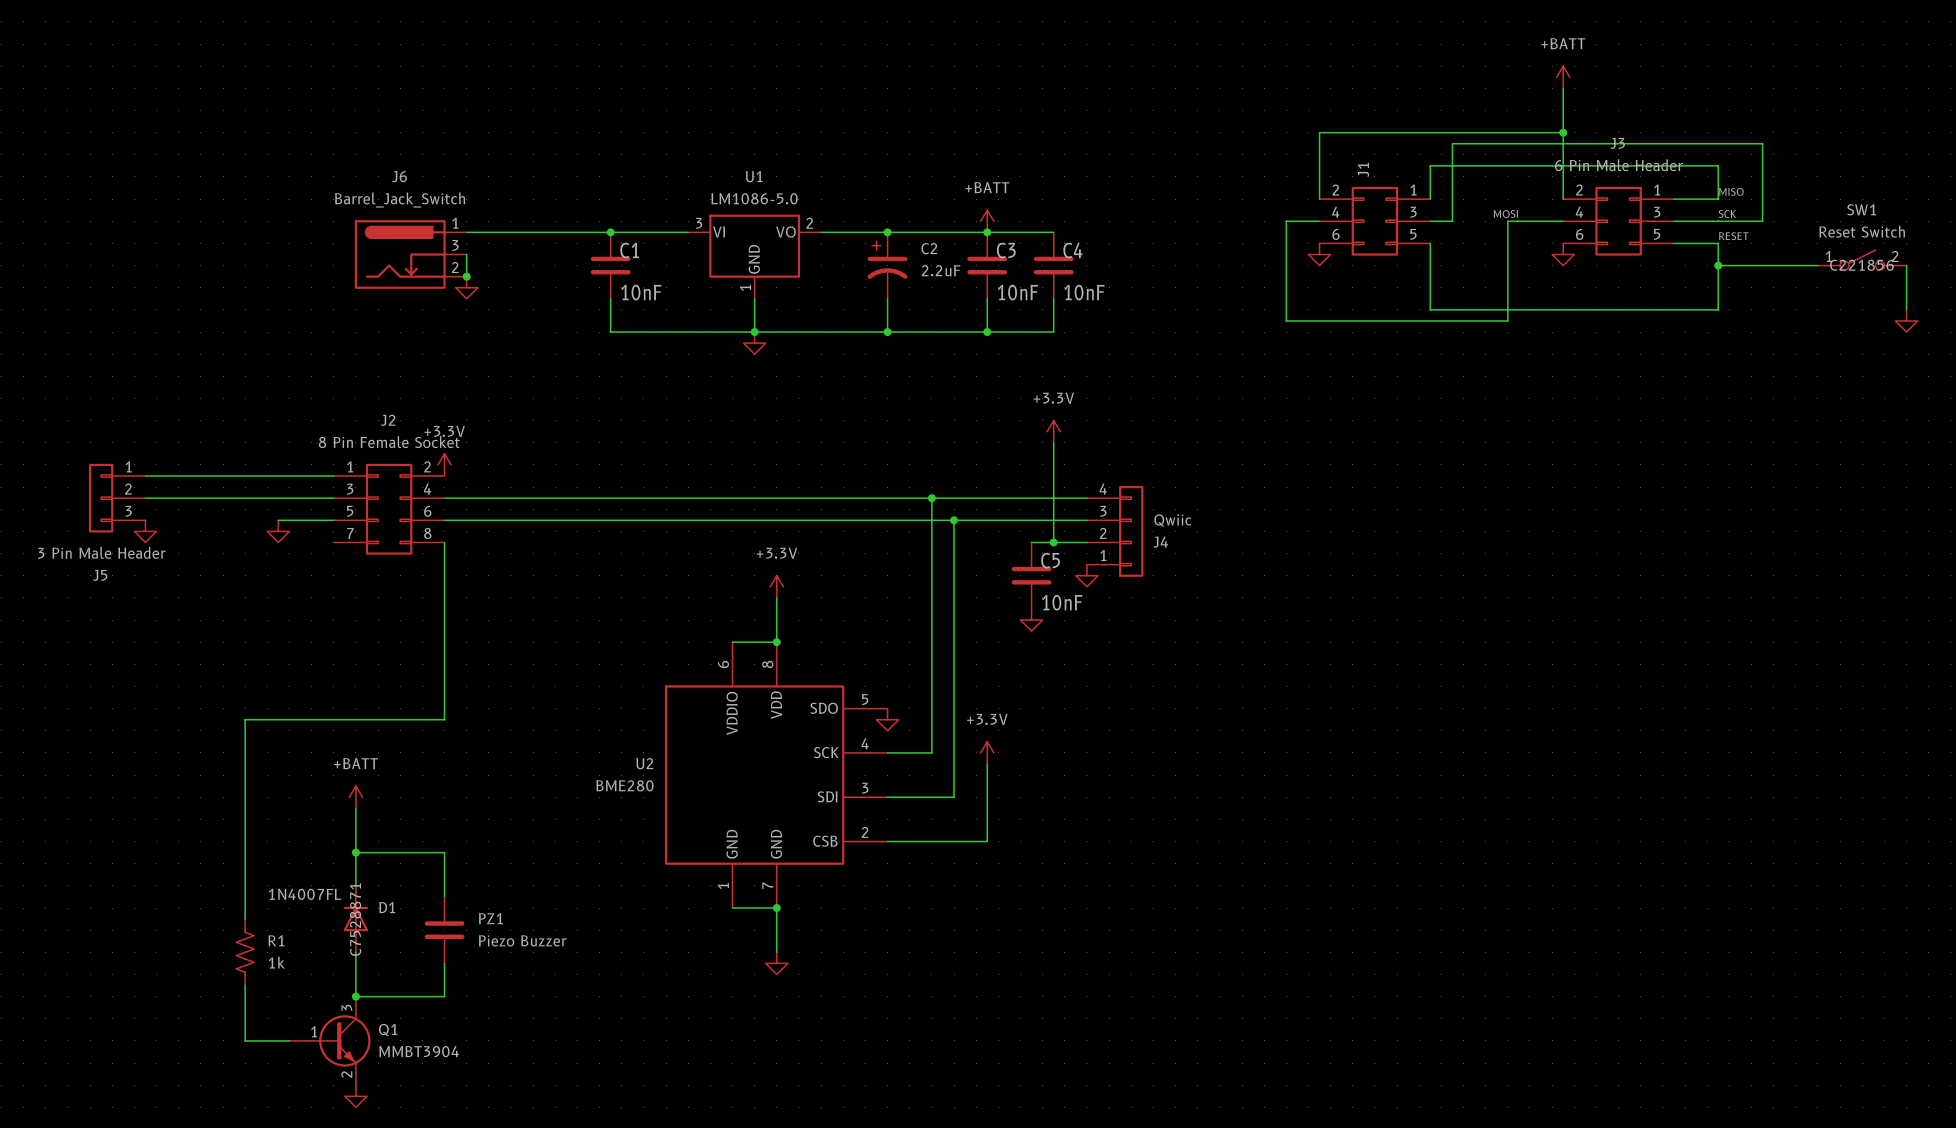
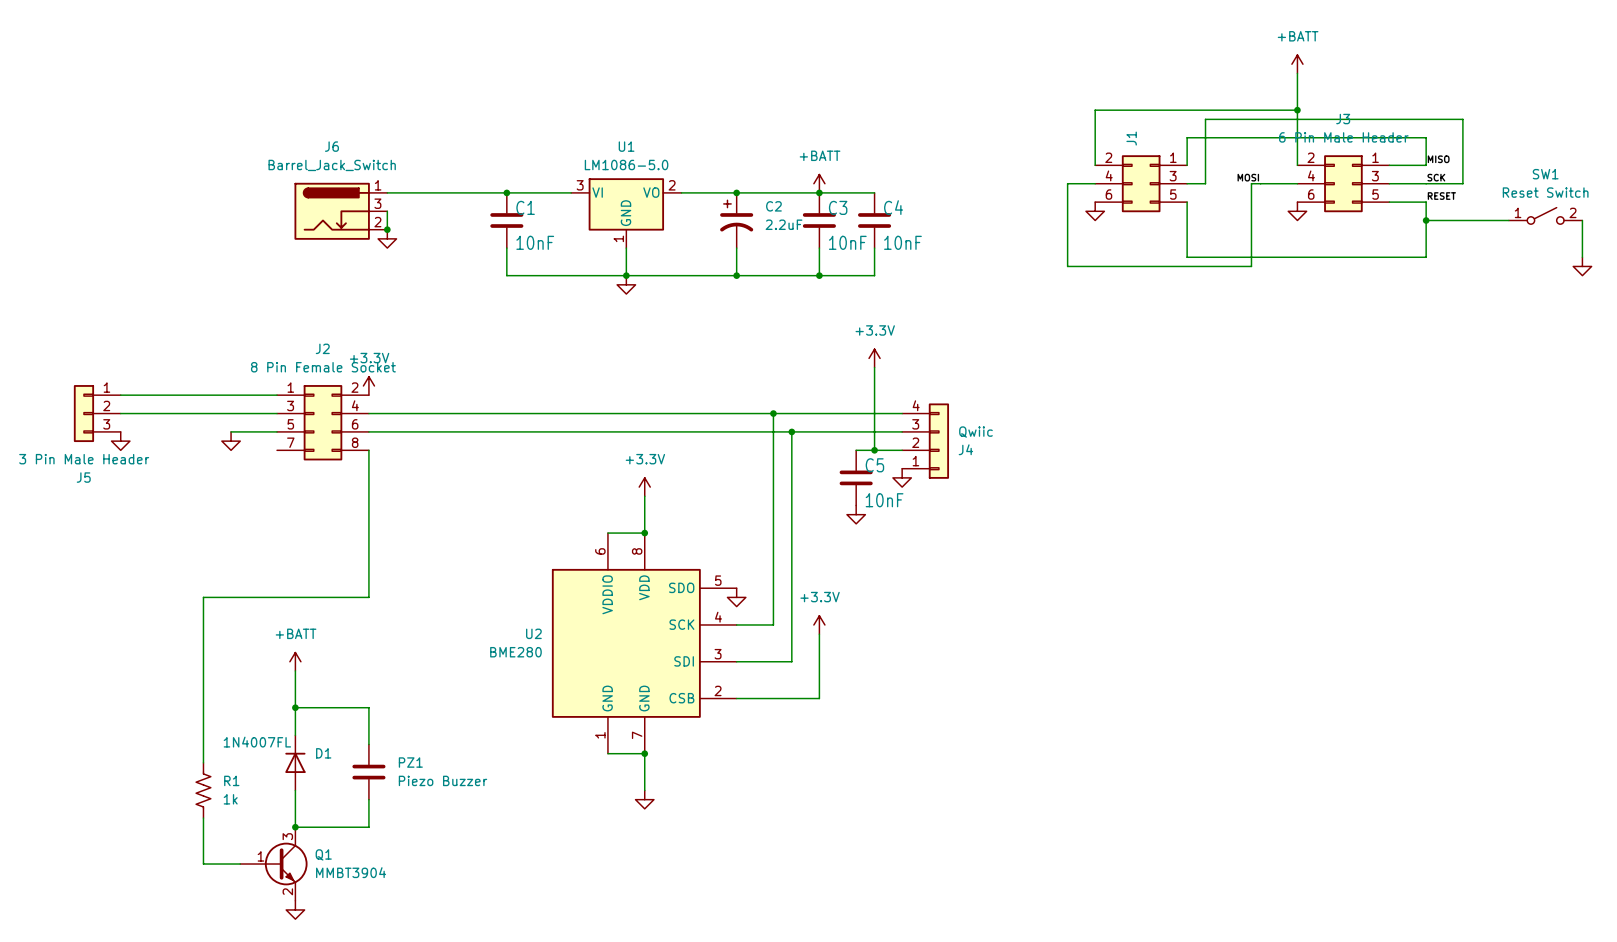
SW1 text: C221856 (1861, 265) -> none
D1 text: C7528871 (355, 919) -> none

